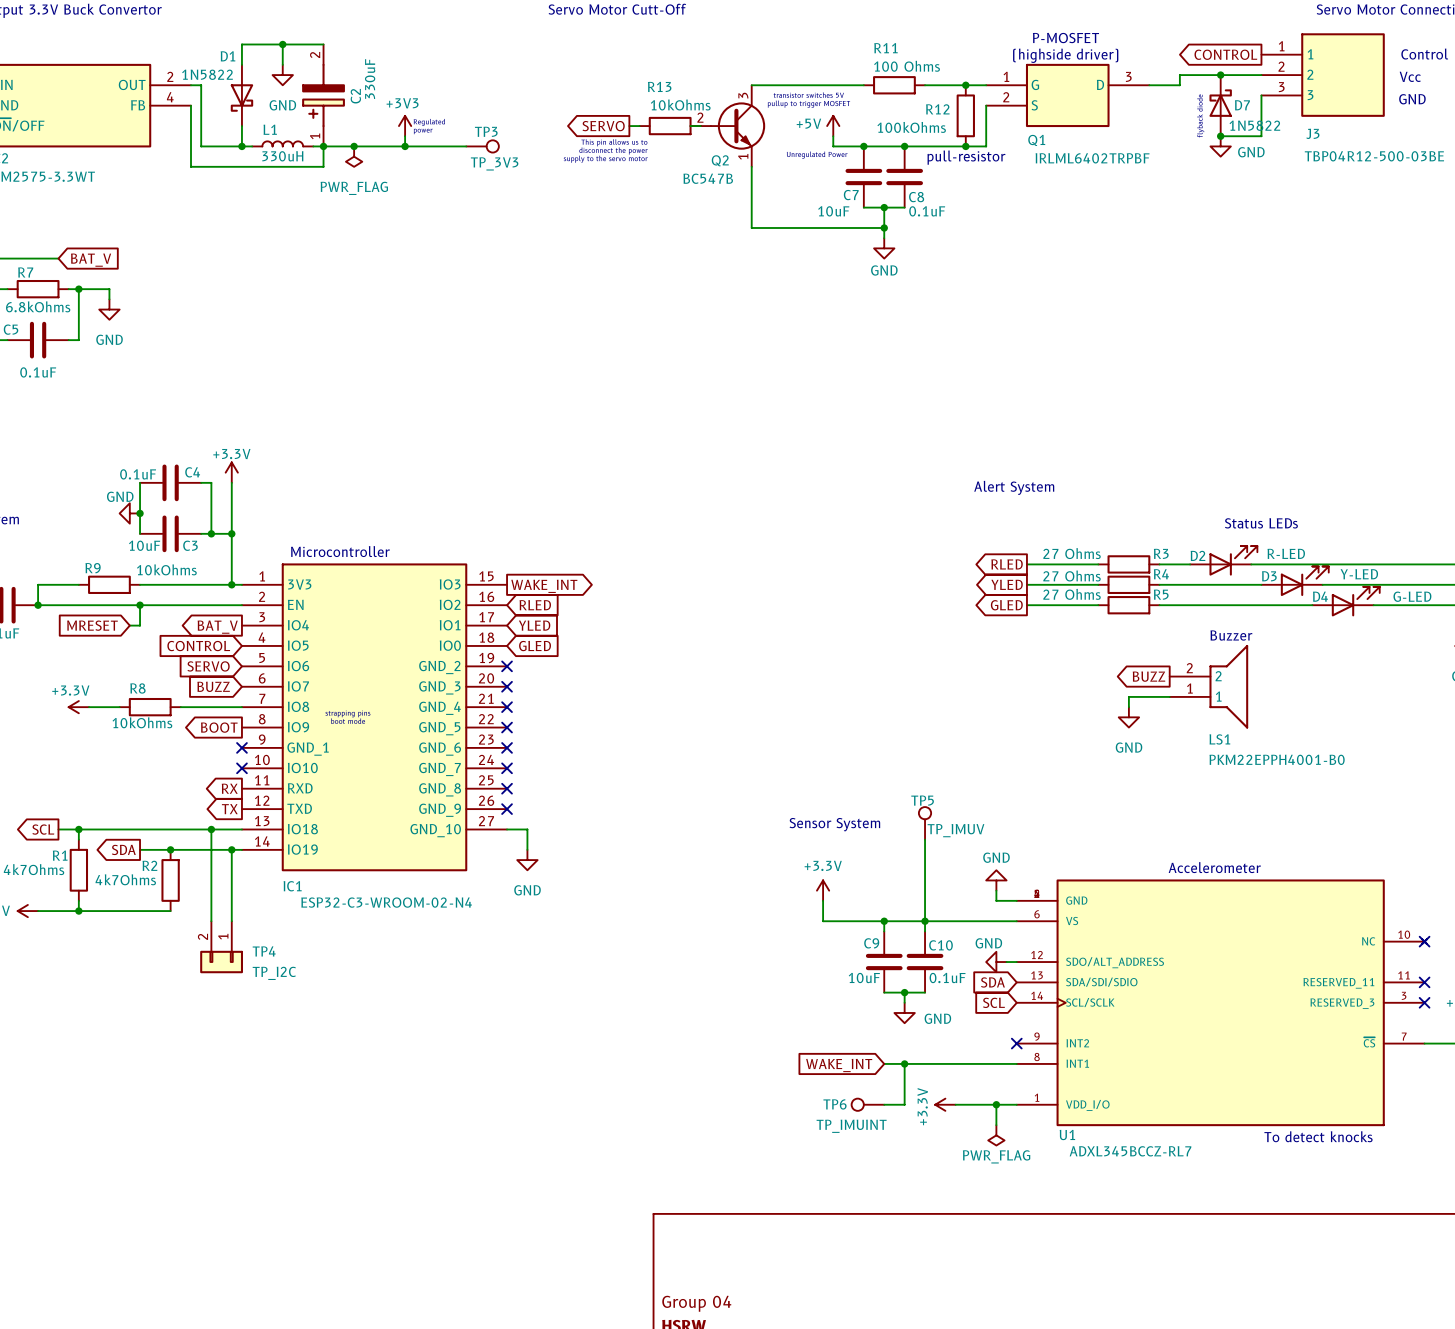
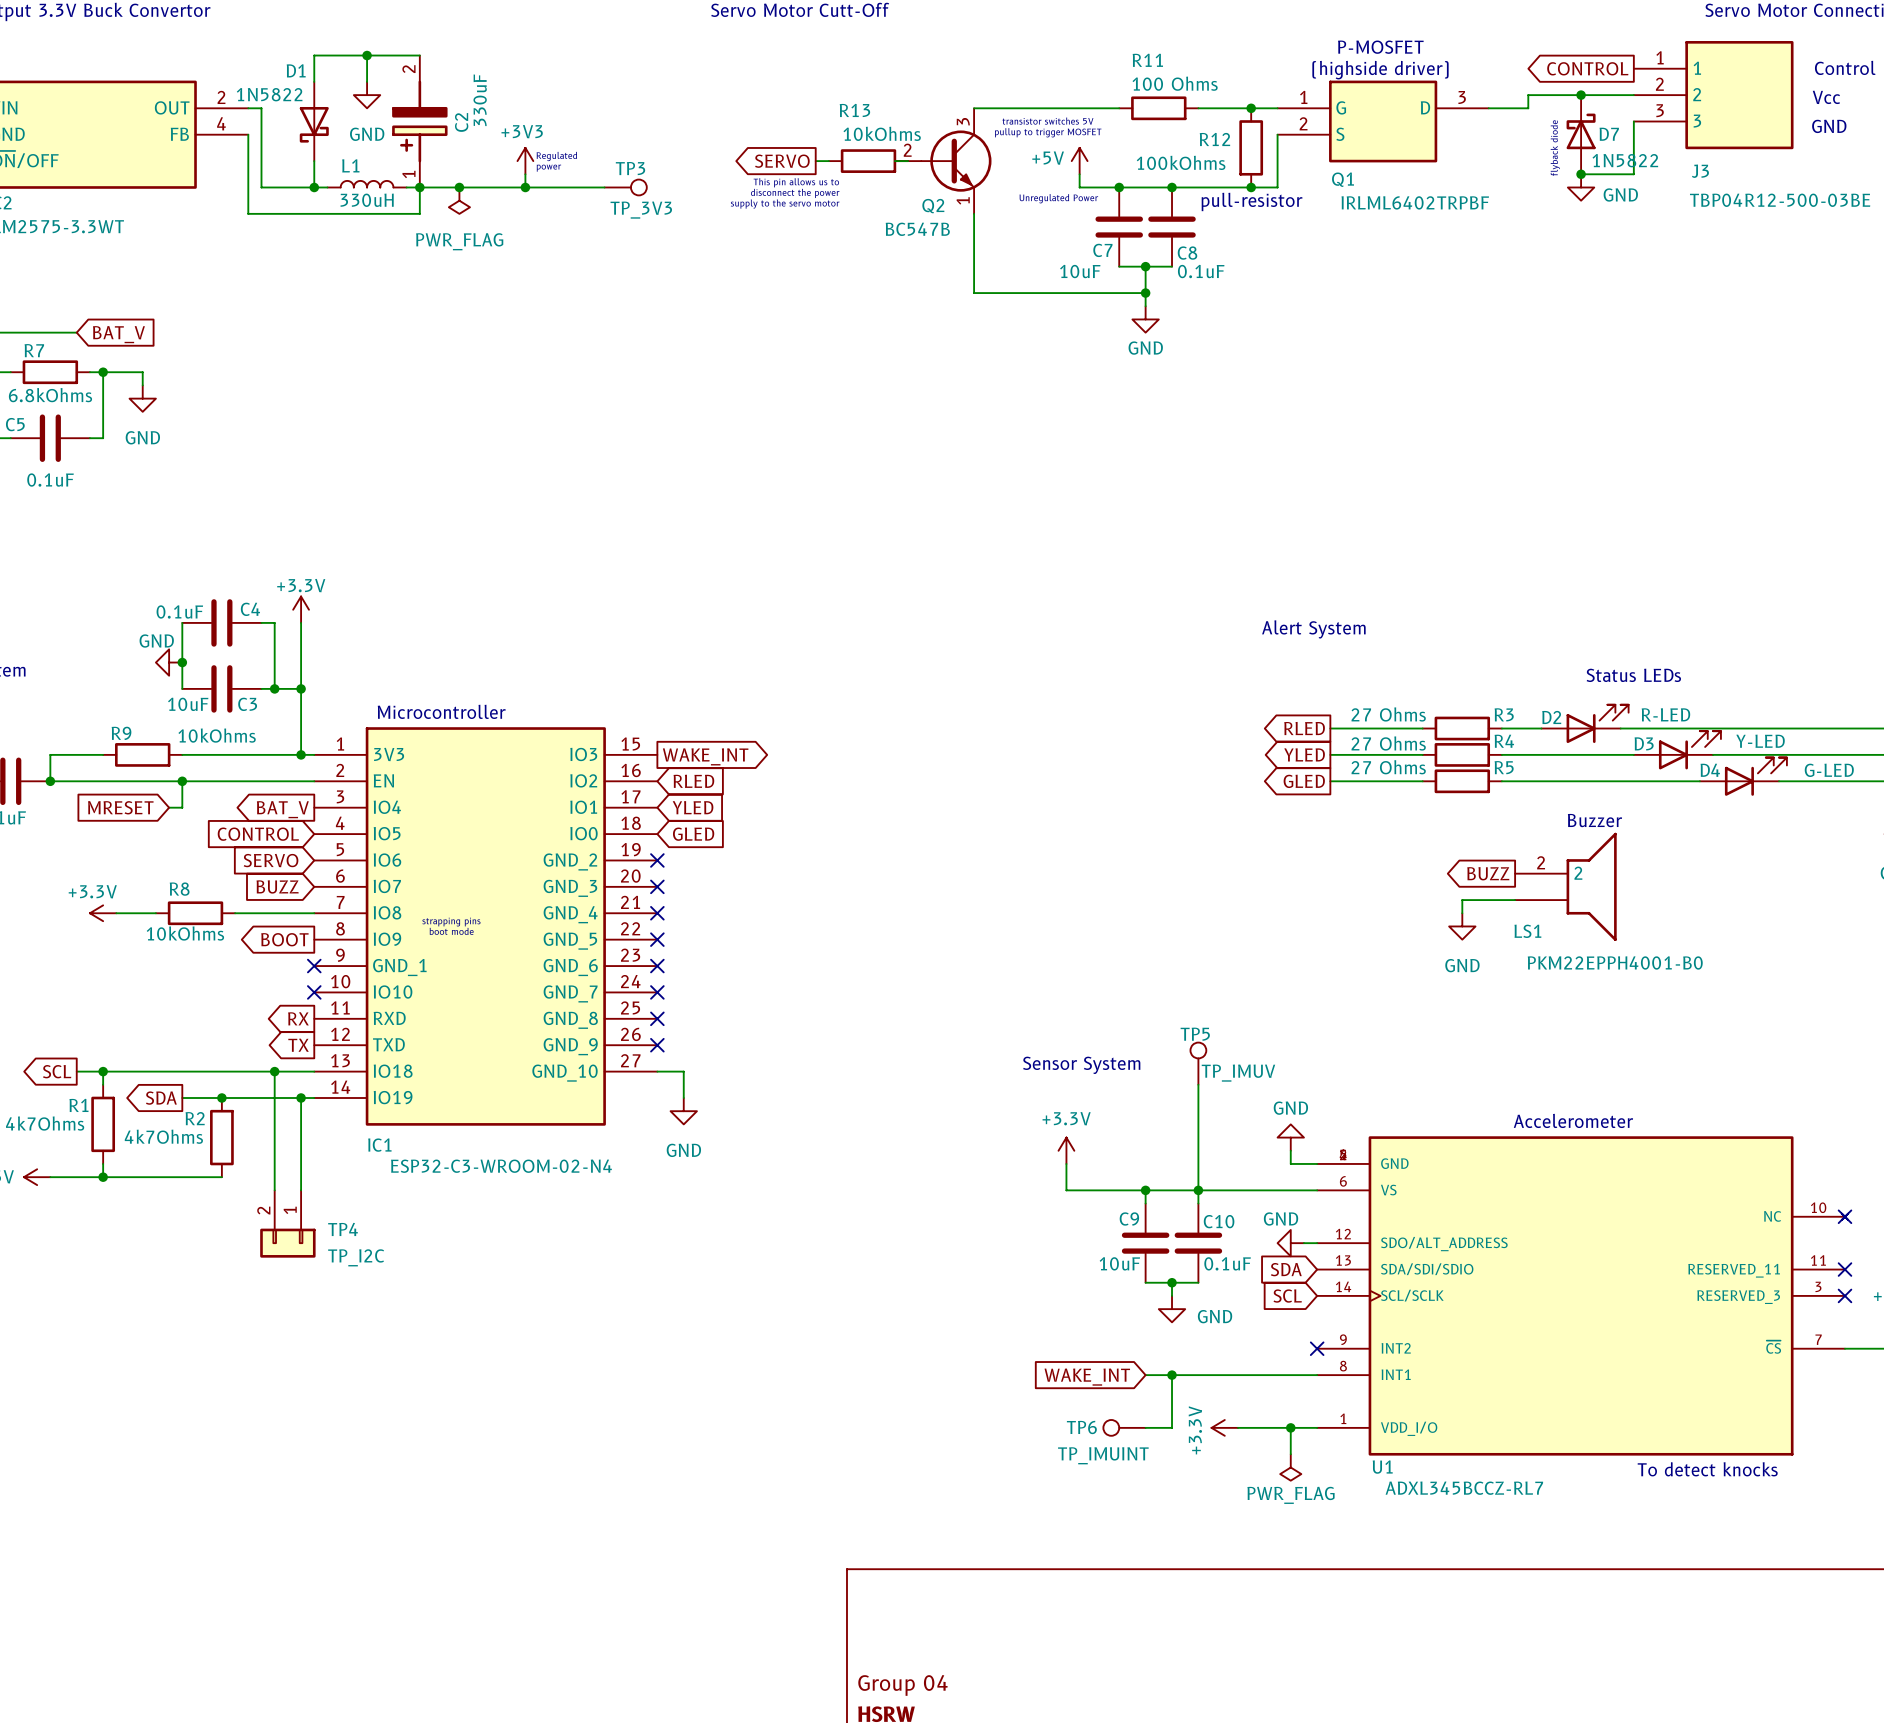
LS1 pin number: 1 (1189, 688) -> none
LS1 pin name: 1 (1218, 696) -> none
LS1 name position: LS1 (1219, 739) -> LS1 (1527, 931)
LS1 value position: PKM22EPPH4001-B0 (1277, 759) -> PKM22EPPH4001-B0 (1615, 962)

